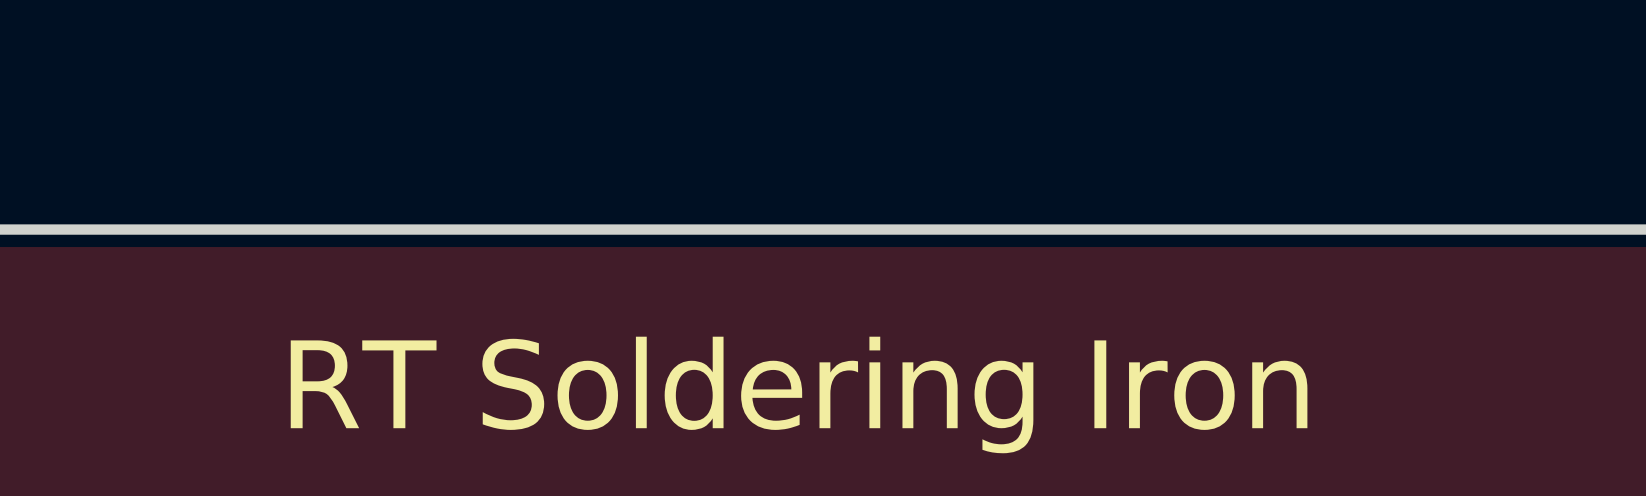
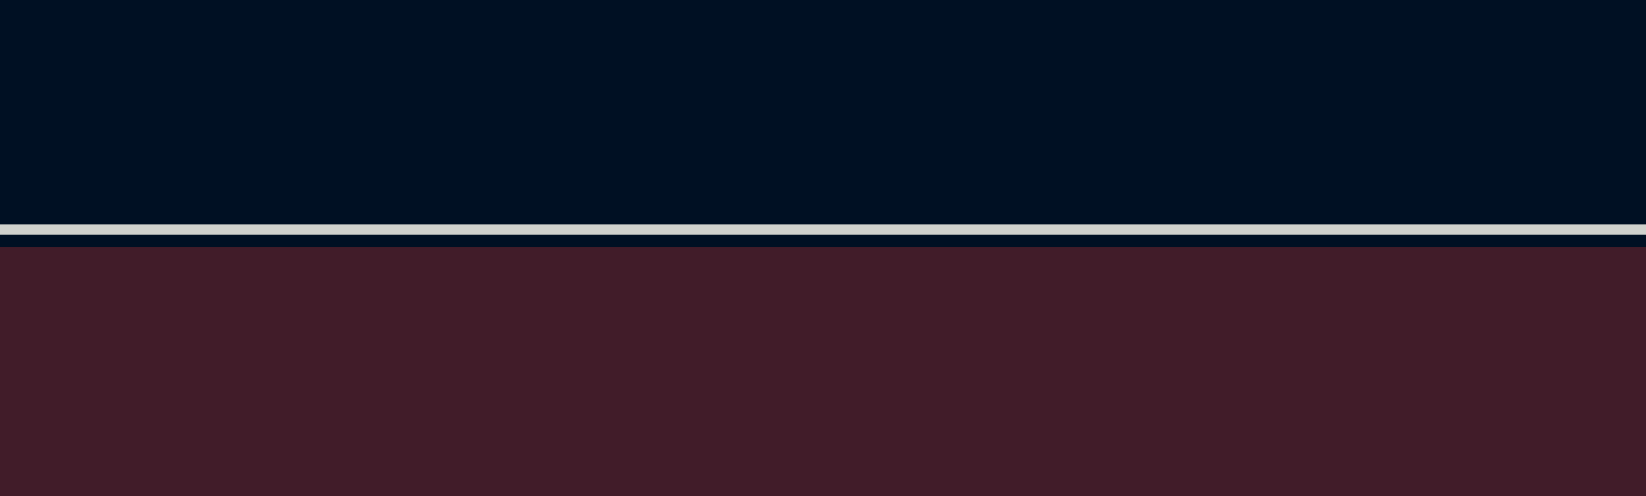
text: RT Soldering Iron (799, 394) -> none

